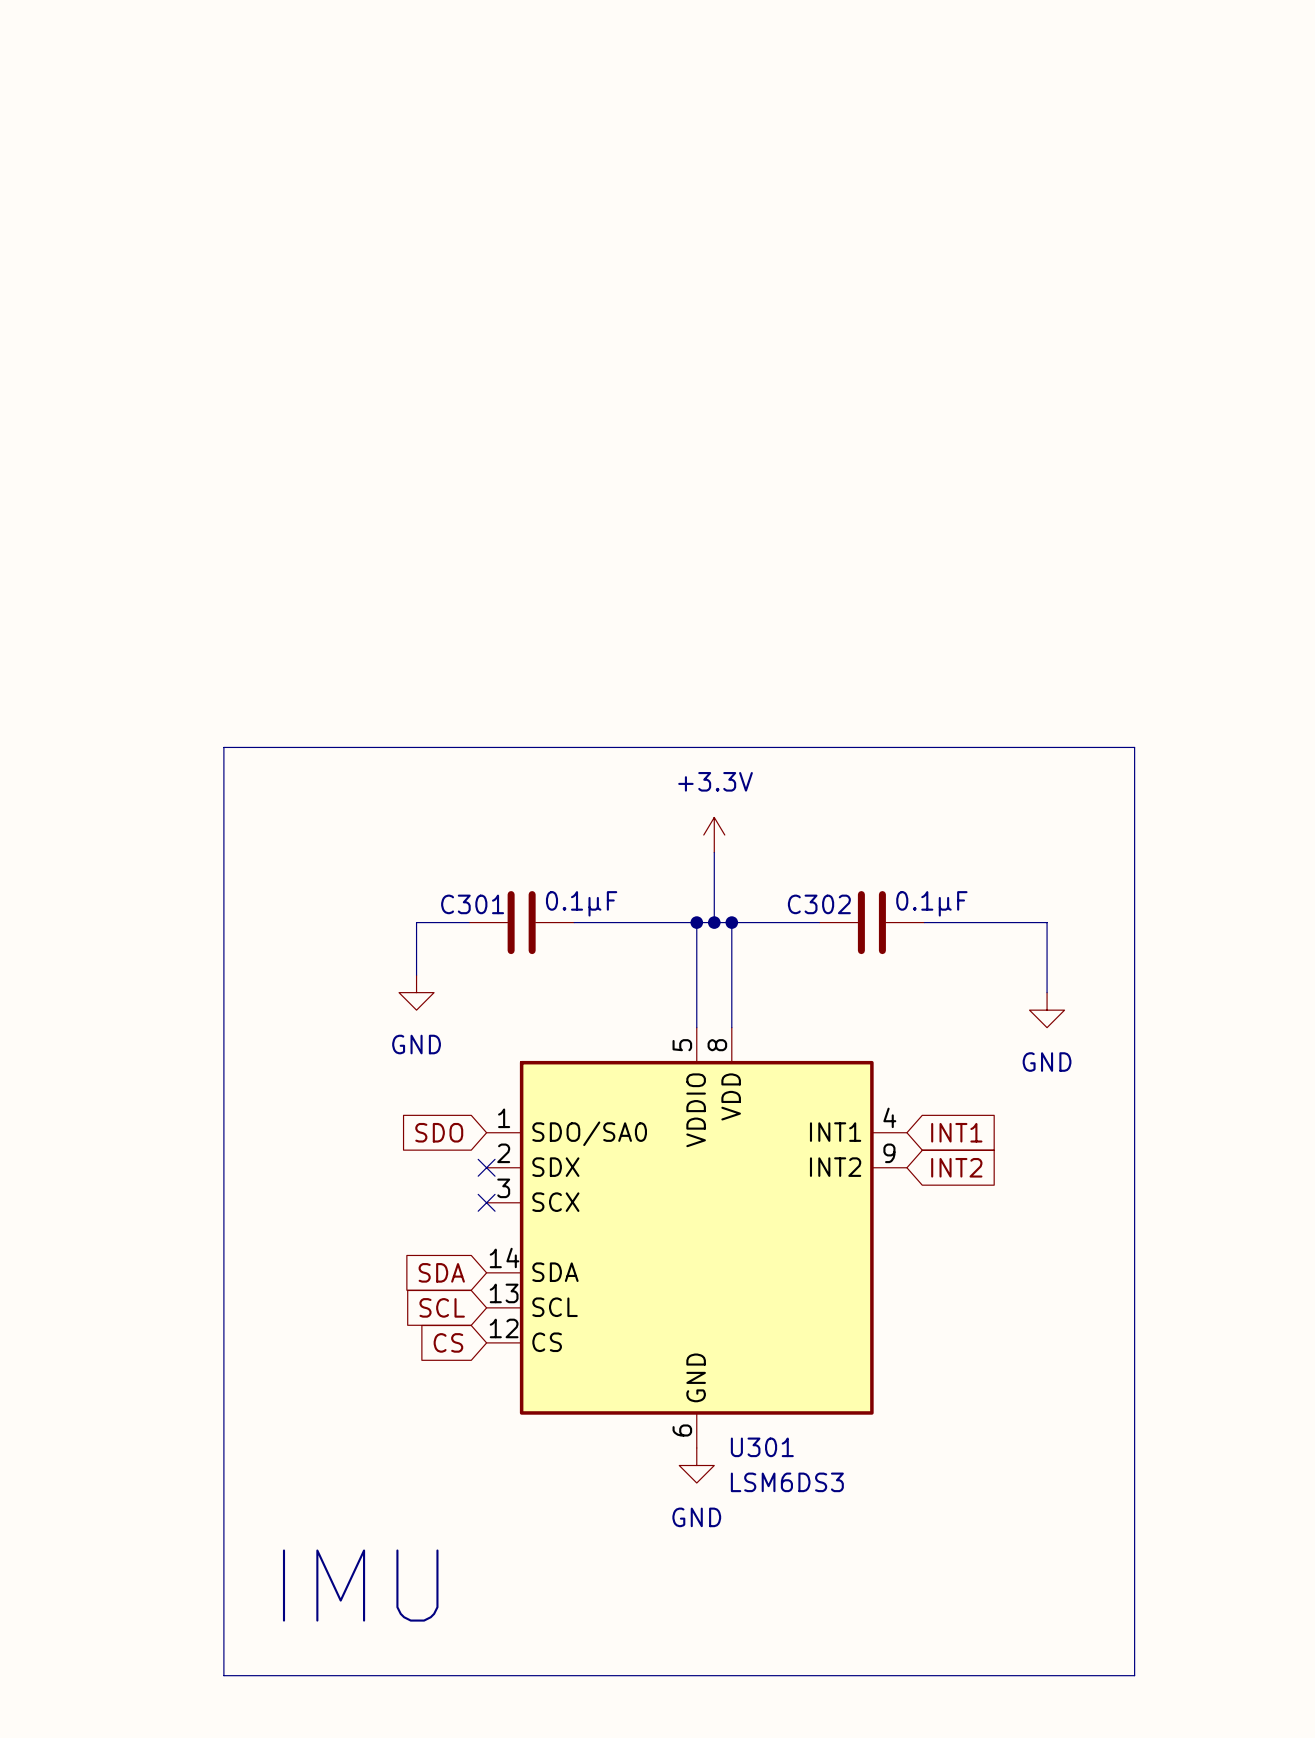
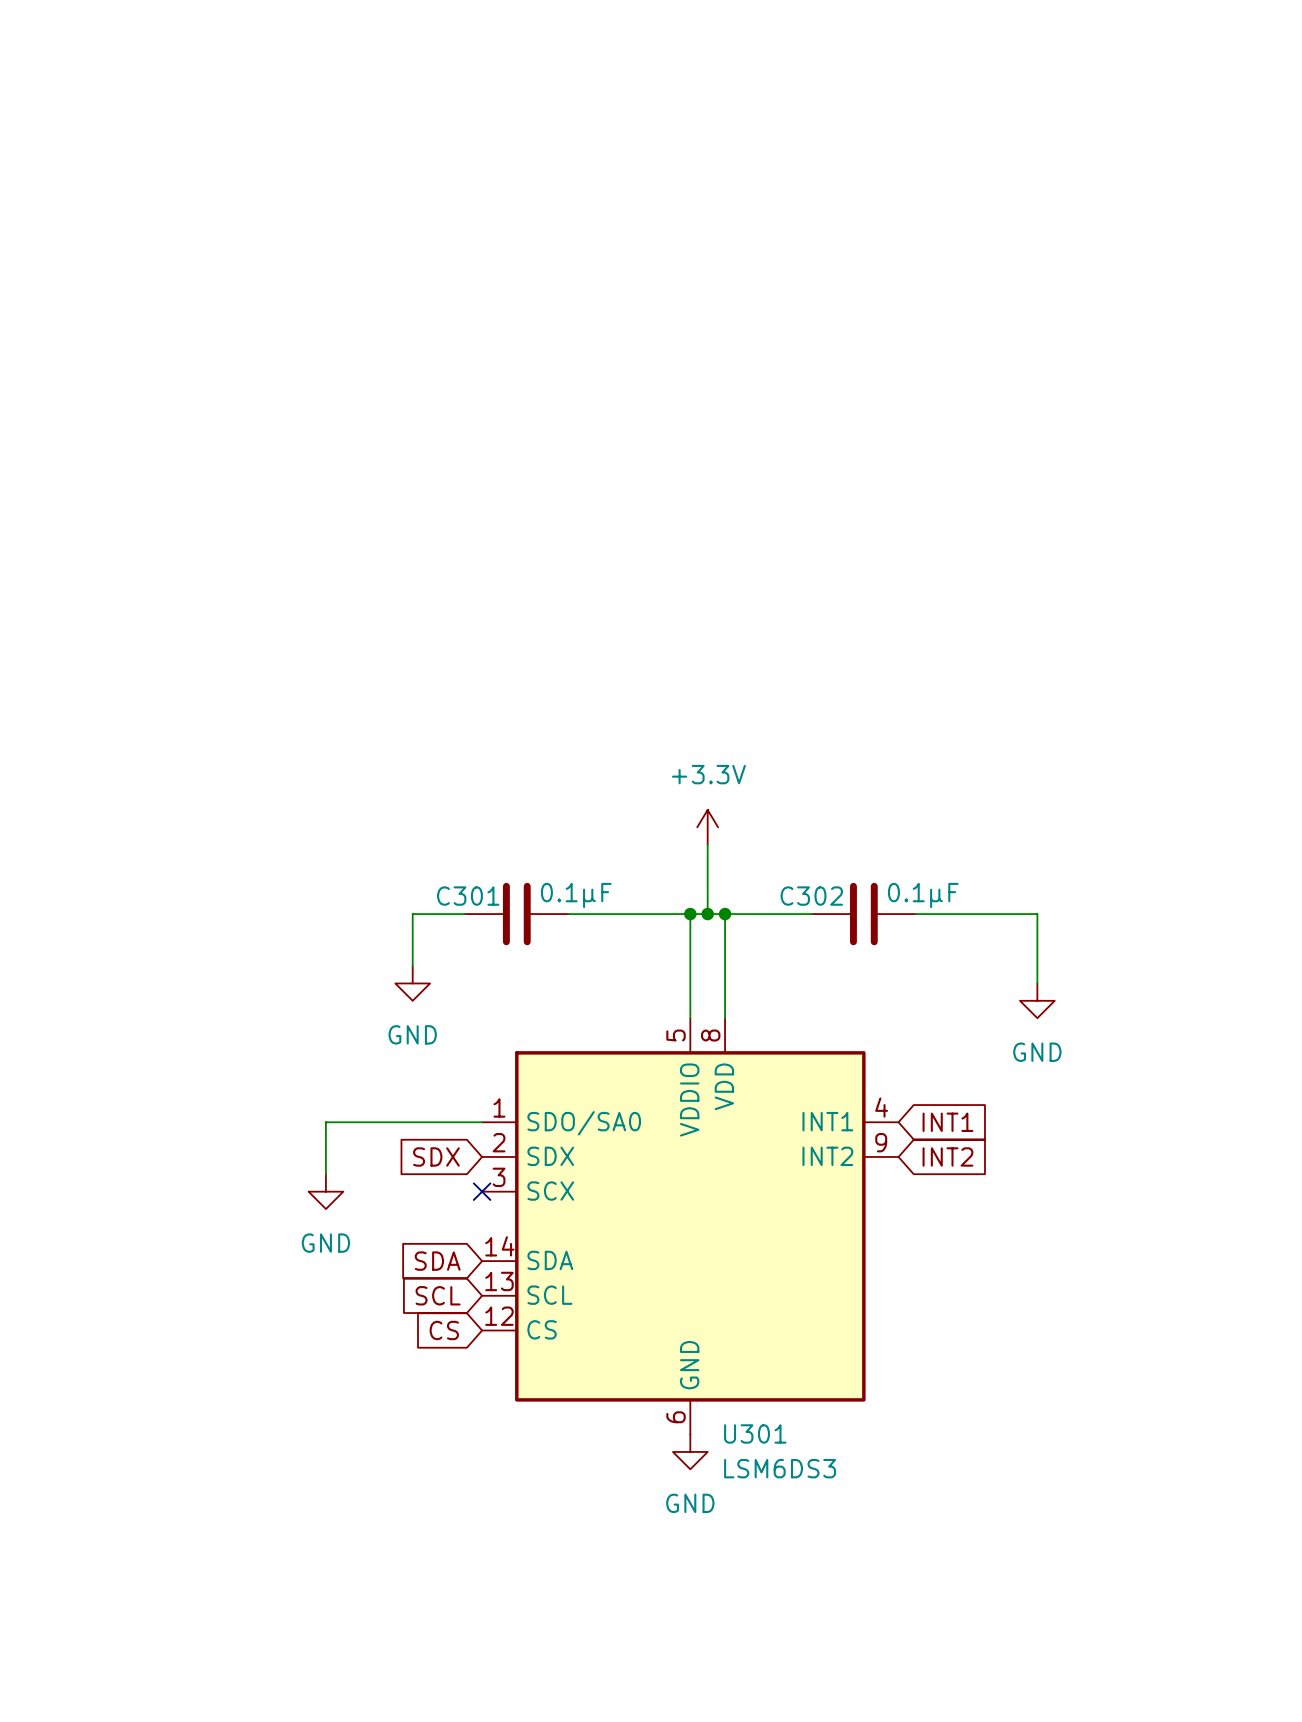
line: (223, 747) (1134, 747) (1134, 1675) (223, 1675) (223, 747) -> none
global label: SDO (439, 1132) -> SDX (436, 1156)
wire: none -> (482, 1122) (325, 1122) (325, 1174)
no-connect mark: (486, 1167) -> none
power symbol: none -> GND (325, 1191)
text: IMU (360, 1585) -> none

